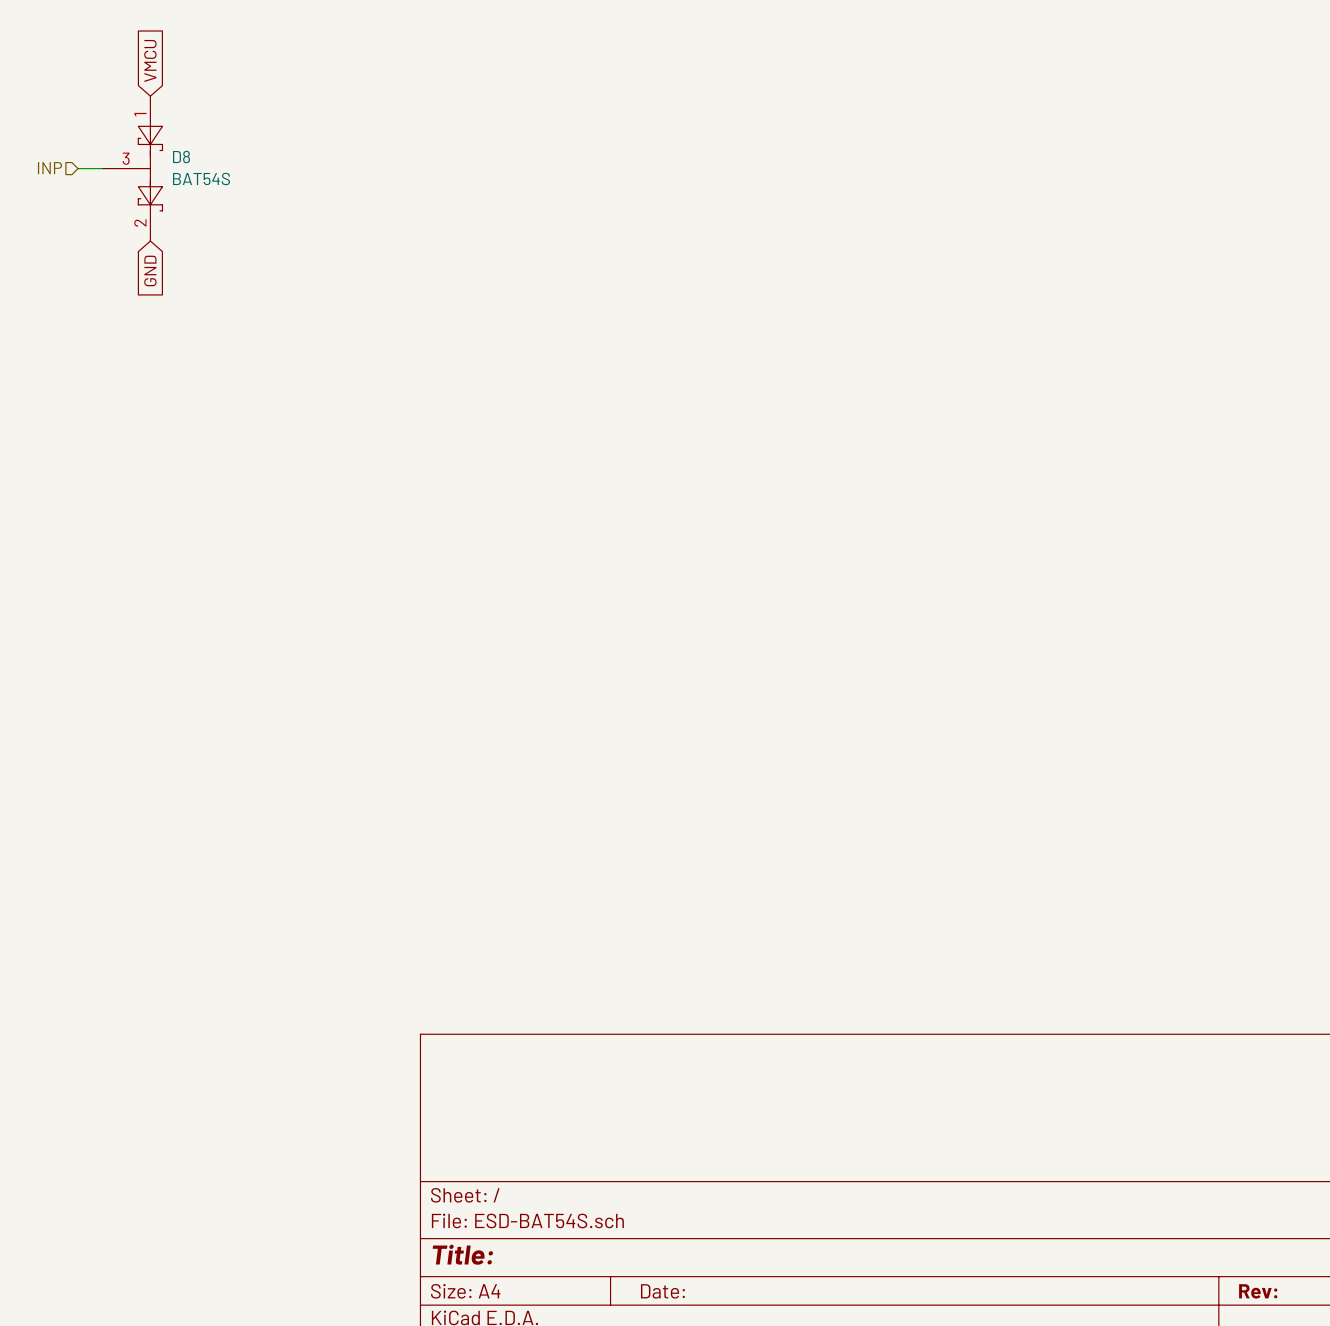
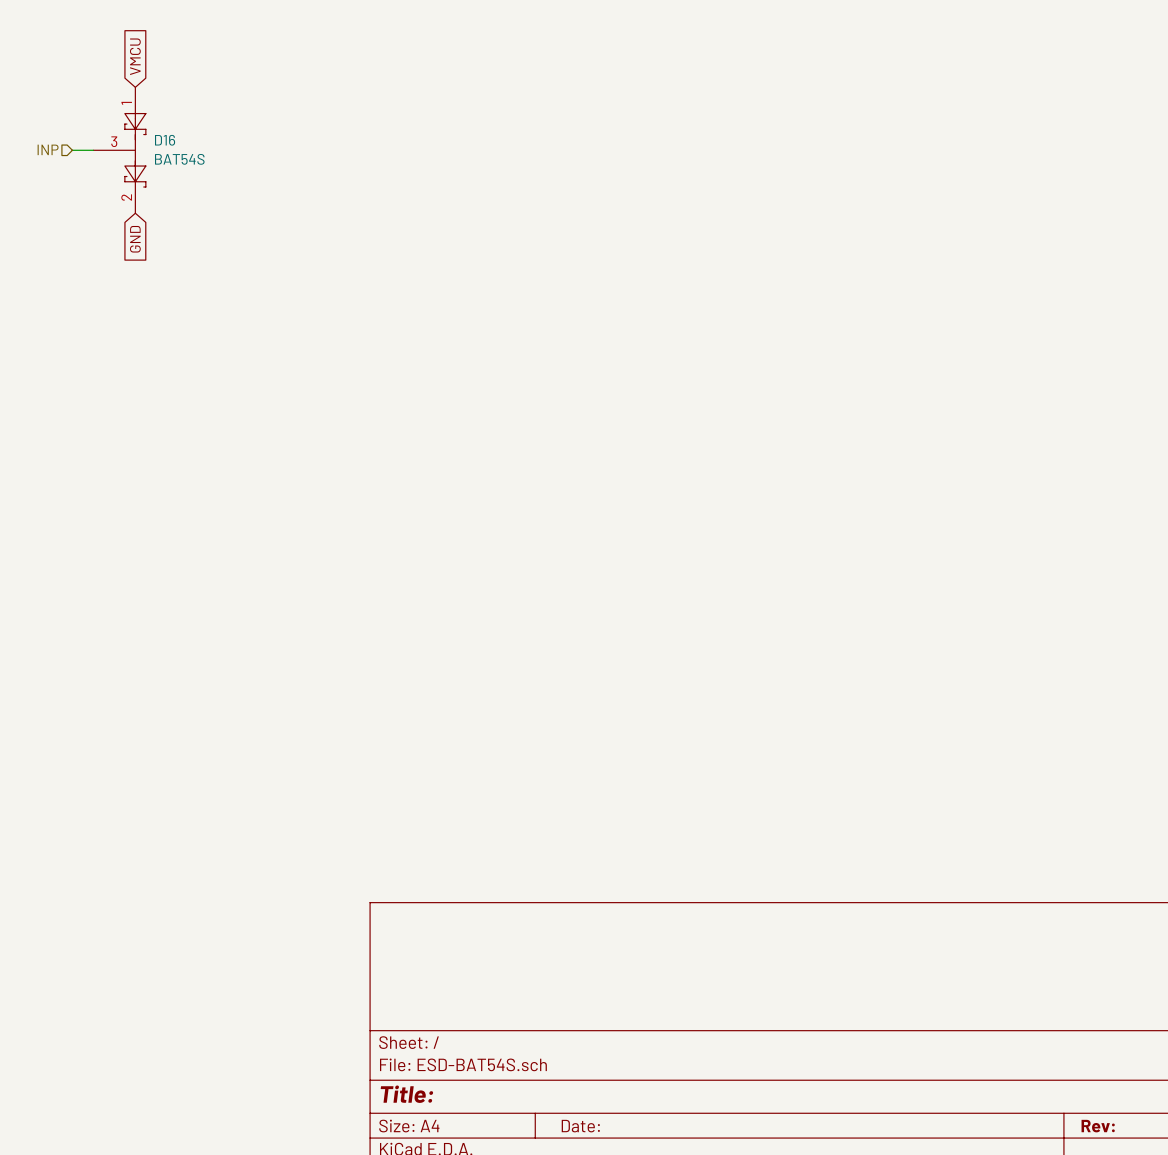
D8 name: D8 (181, 157) -> D16 (165, 140)

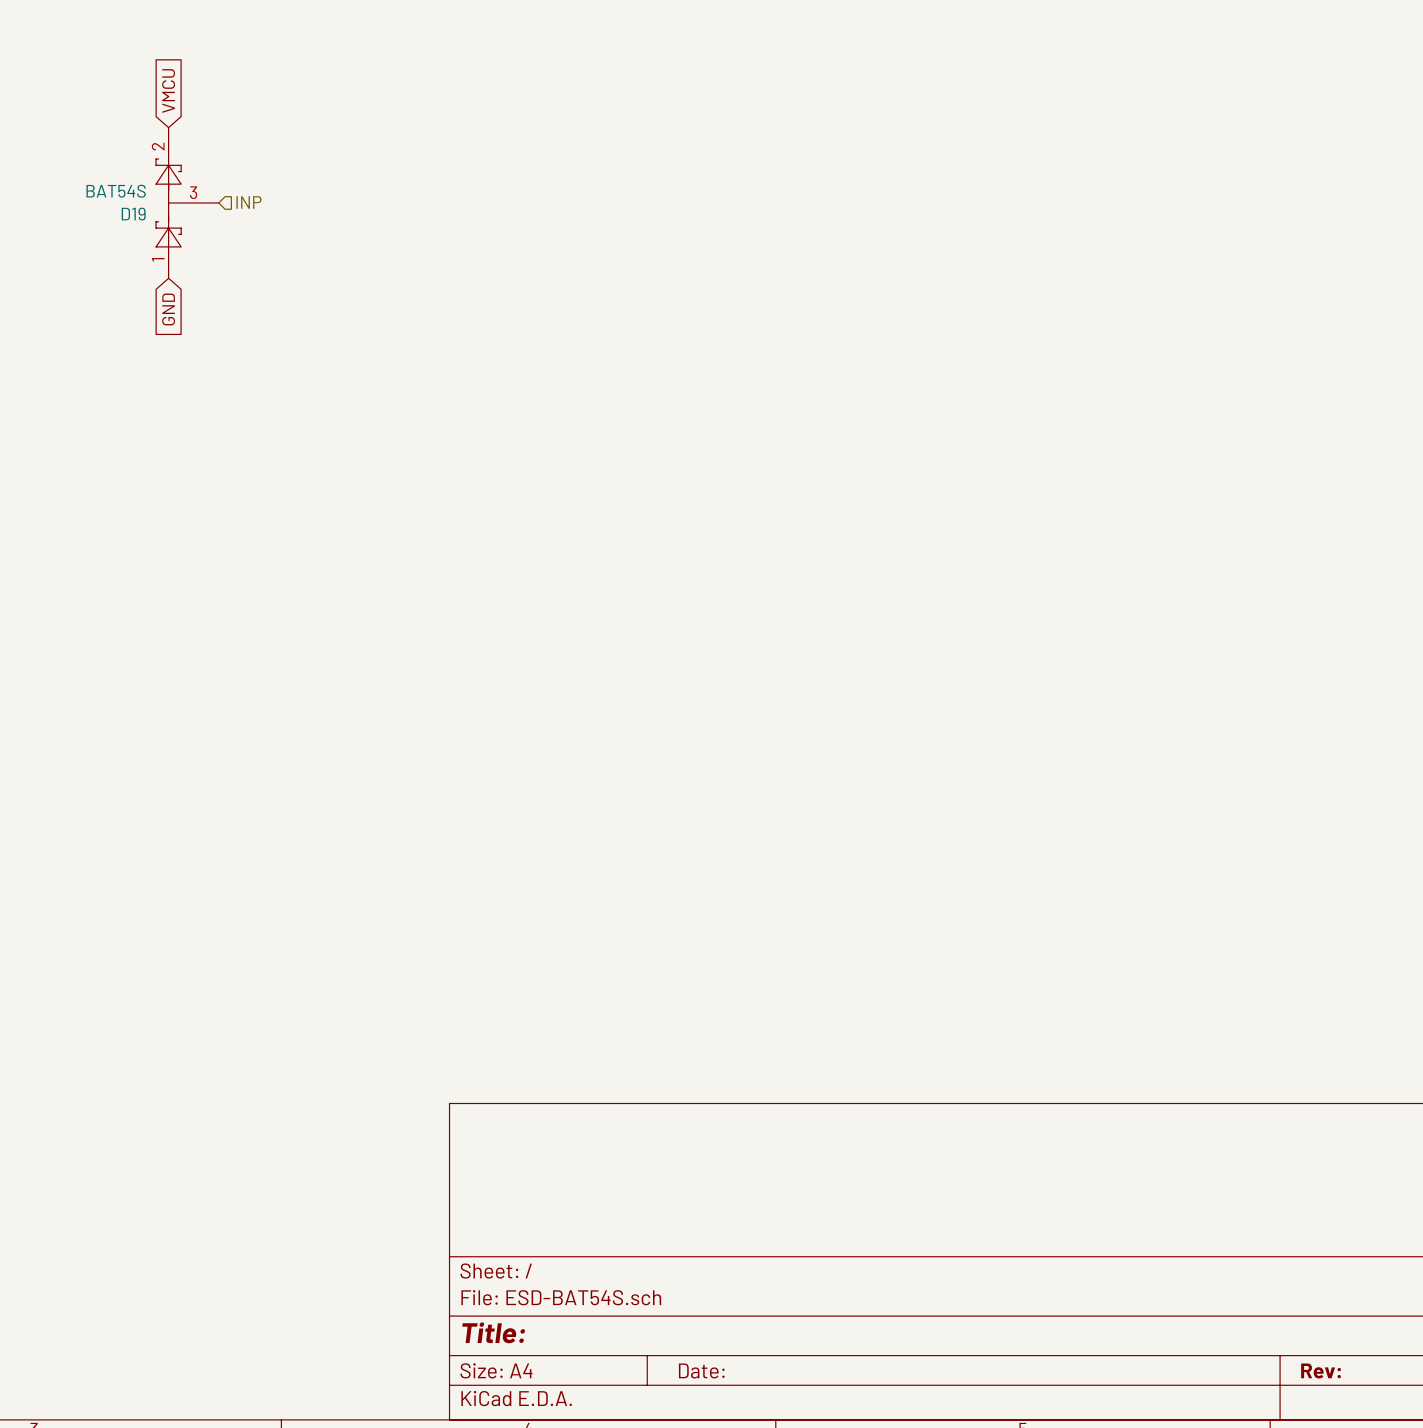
hierarchical label rotation: 0° (48, 149) -> 180° (248, 202)
hierarchical label position: INP (48, 149) -> INP (248, 202)
wire: (72, 150) (93, 150) -> none
D16: BAT54S (119, 150) -> none
D19: none -> BAT54S (187, 202)

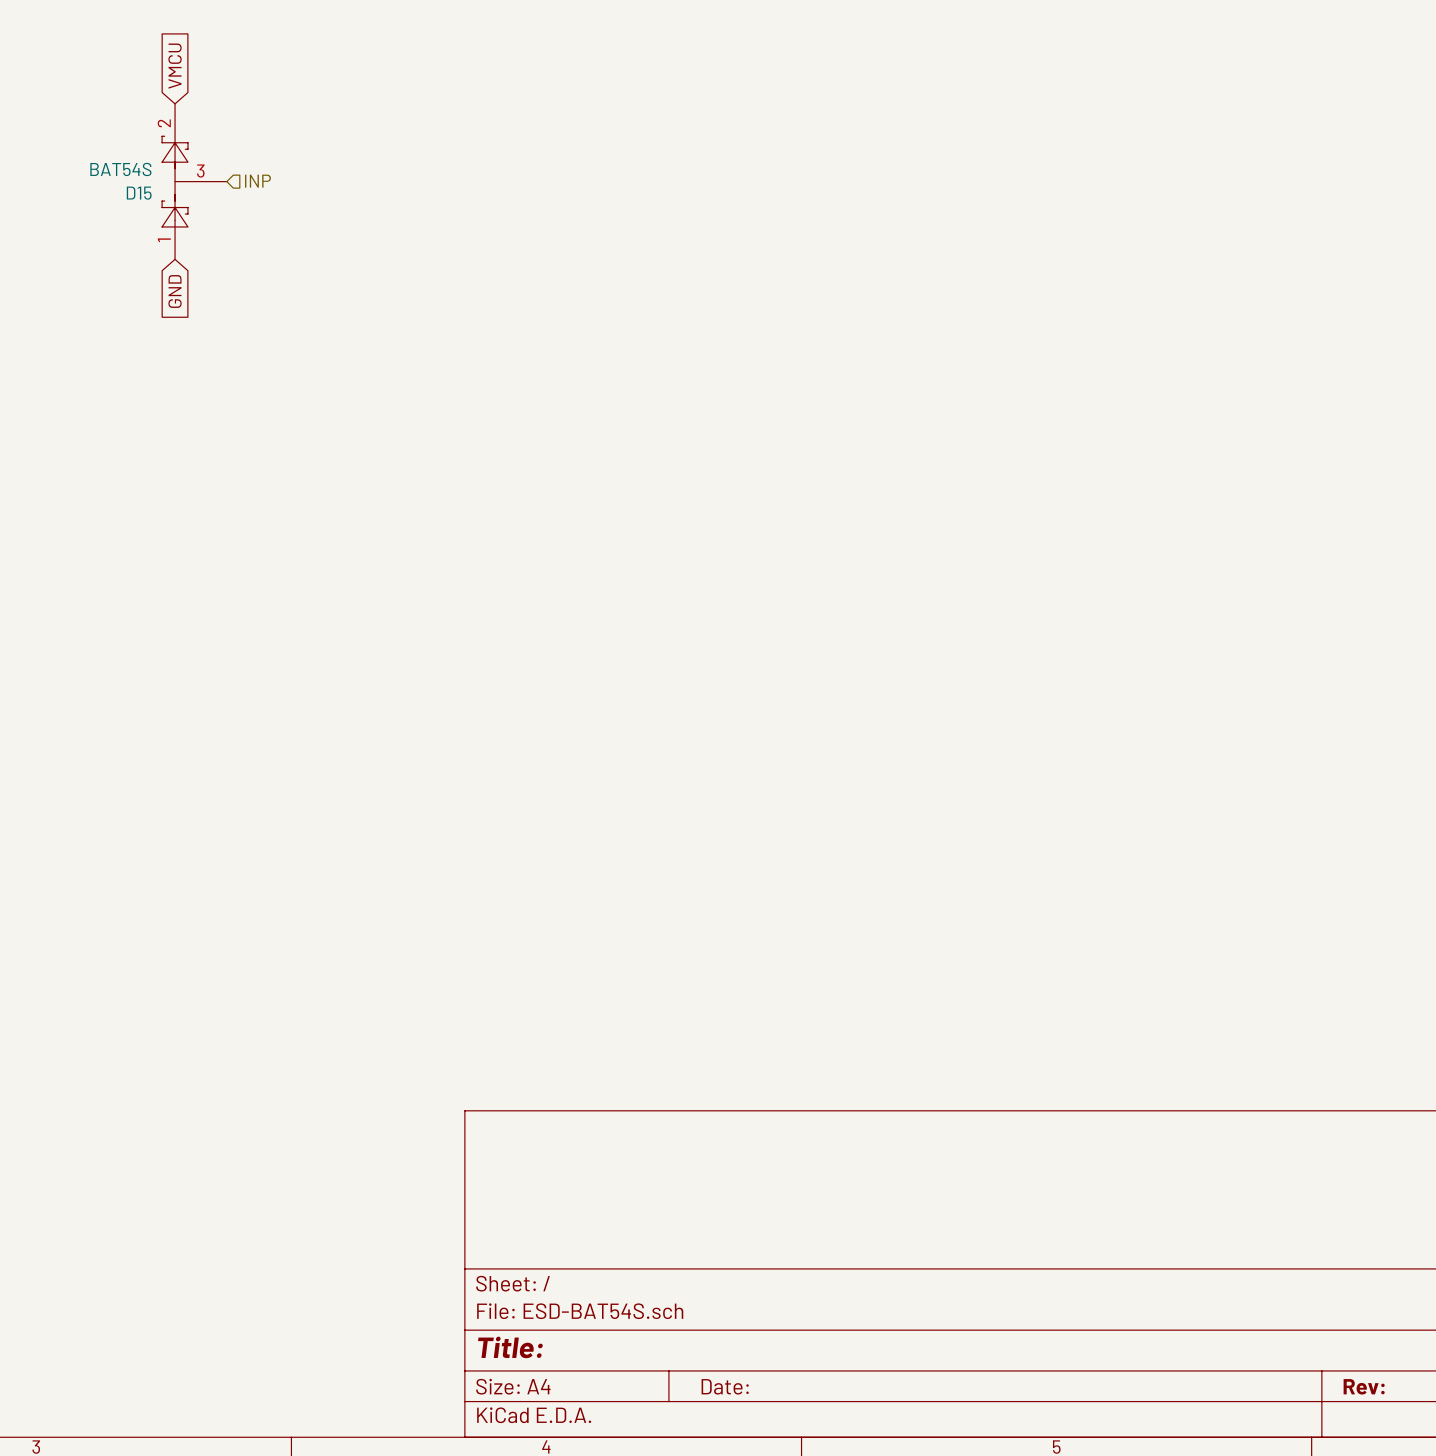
D19 name: D19 (133, 214) -> D15 (139, 193)

